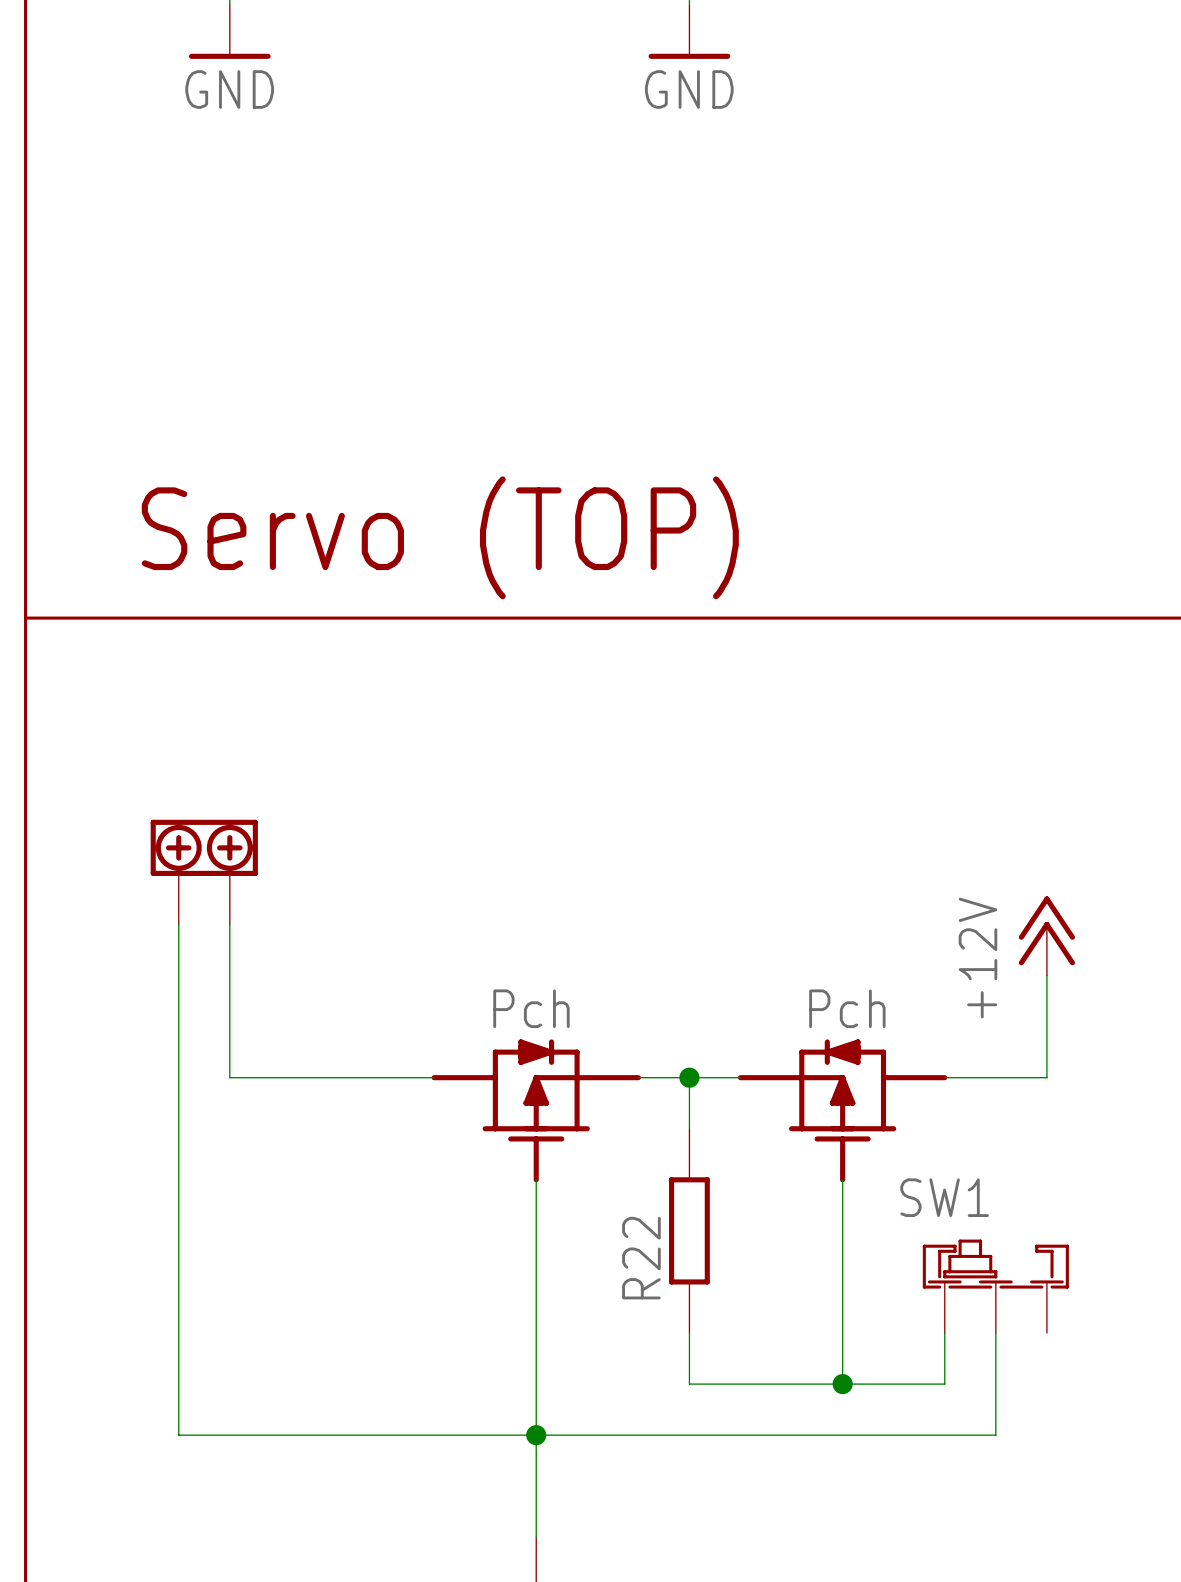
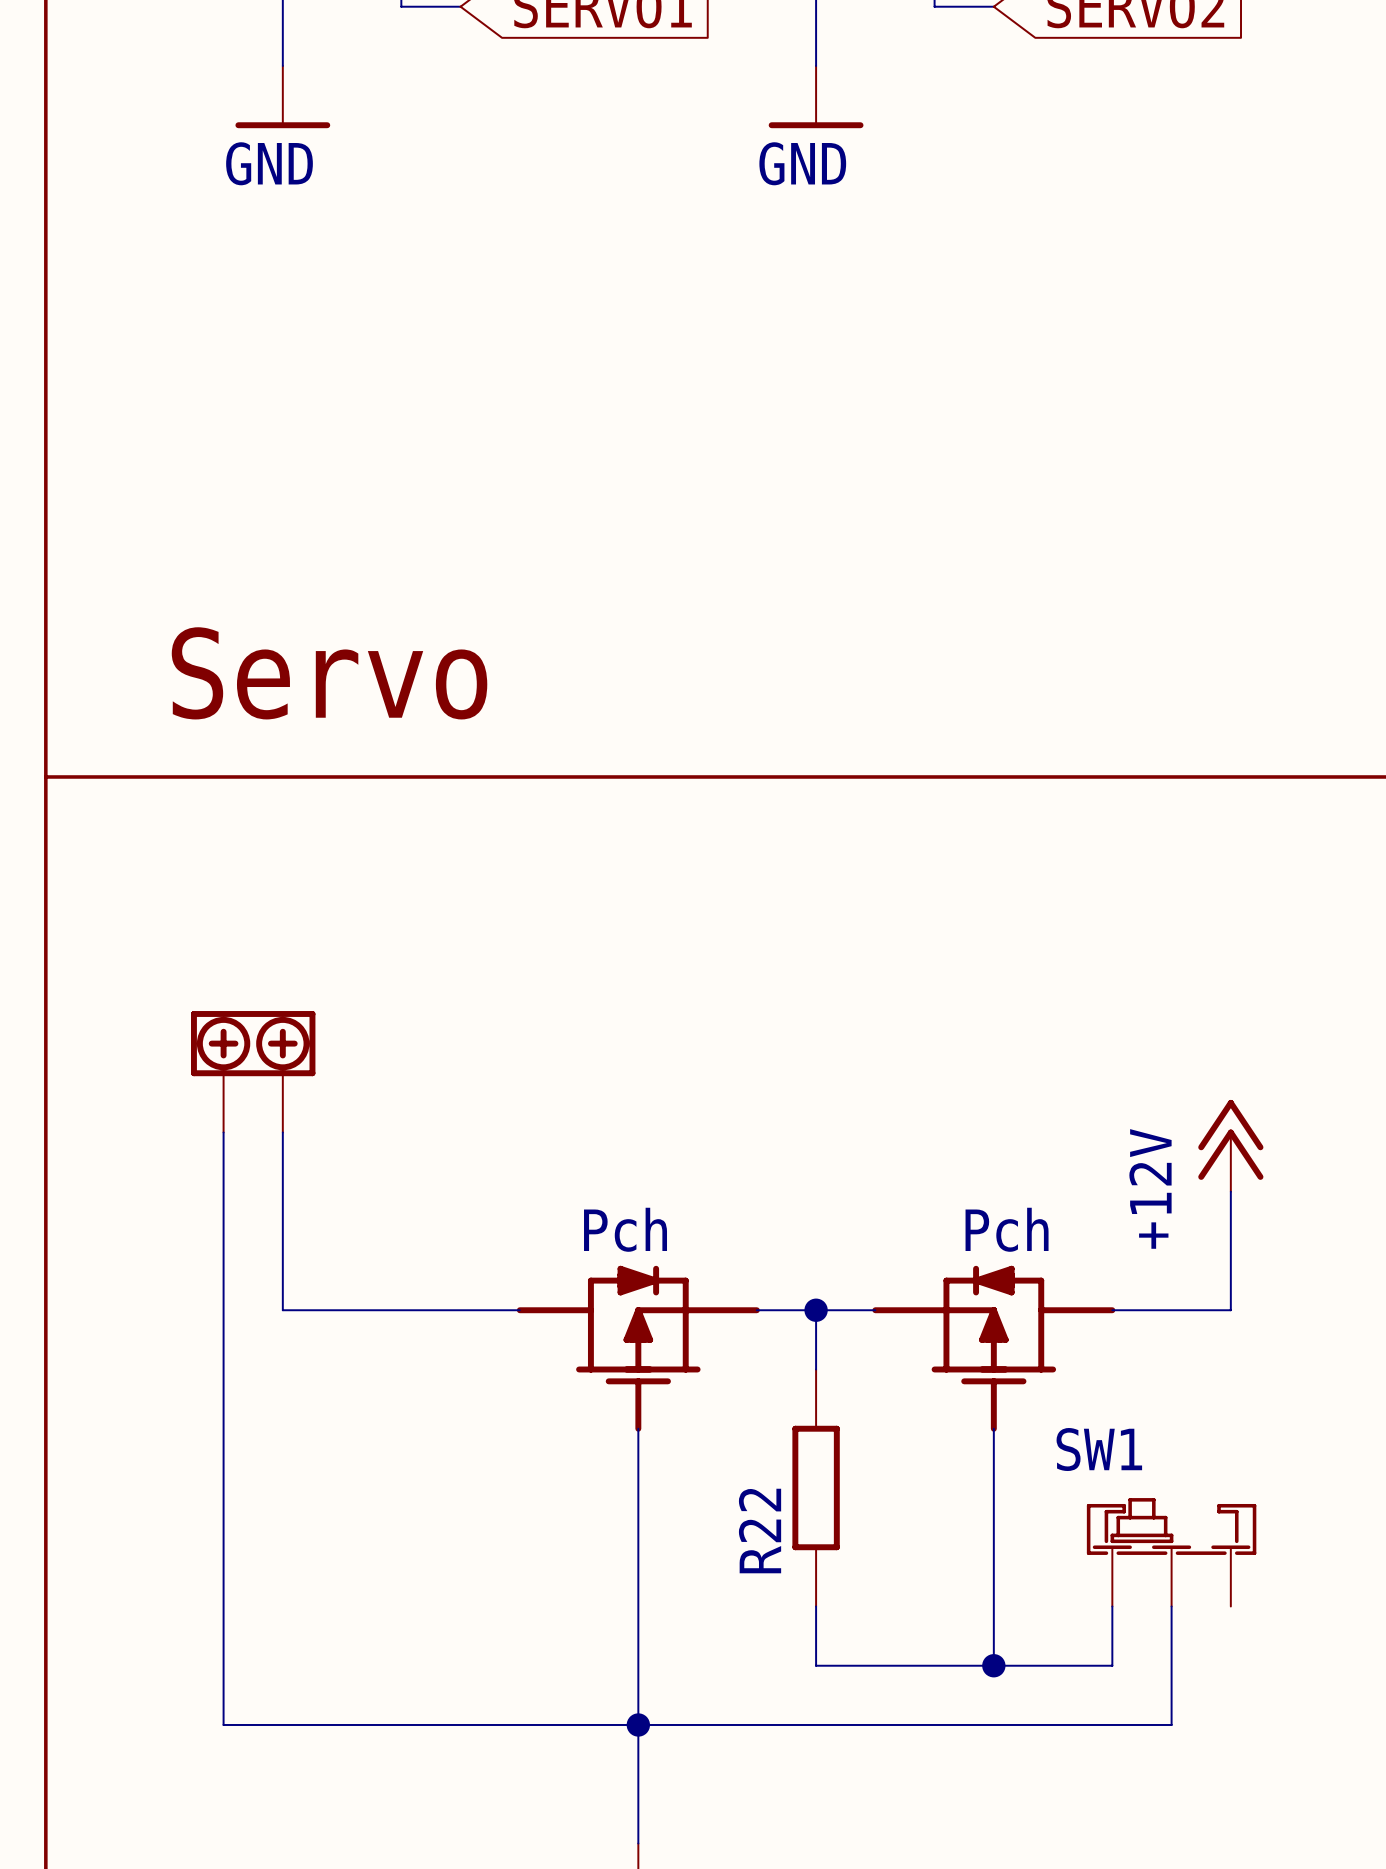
text: Servo (TOP) (440, 537) -> Servo (329, 673)

